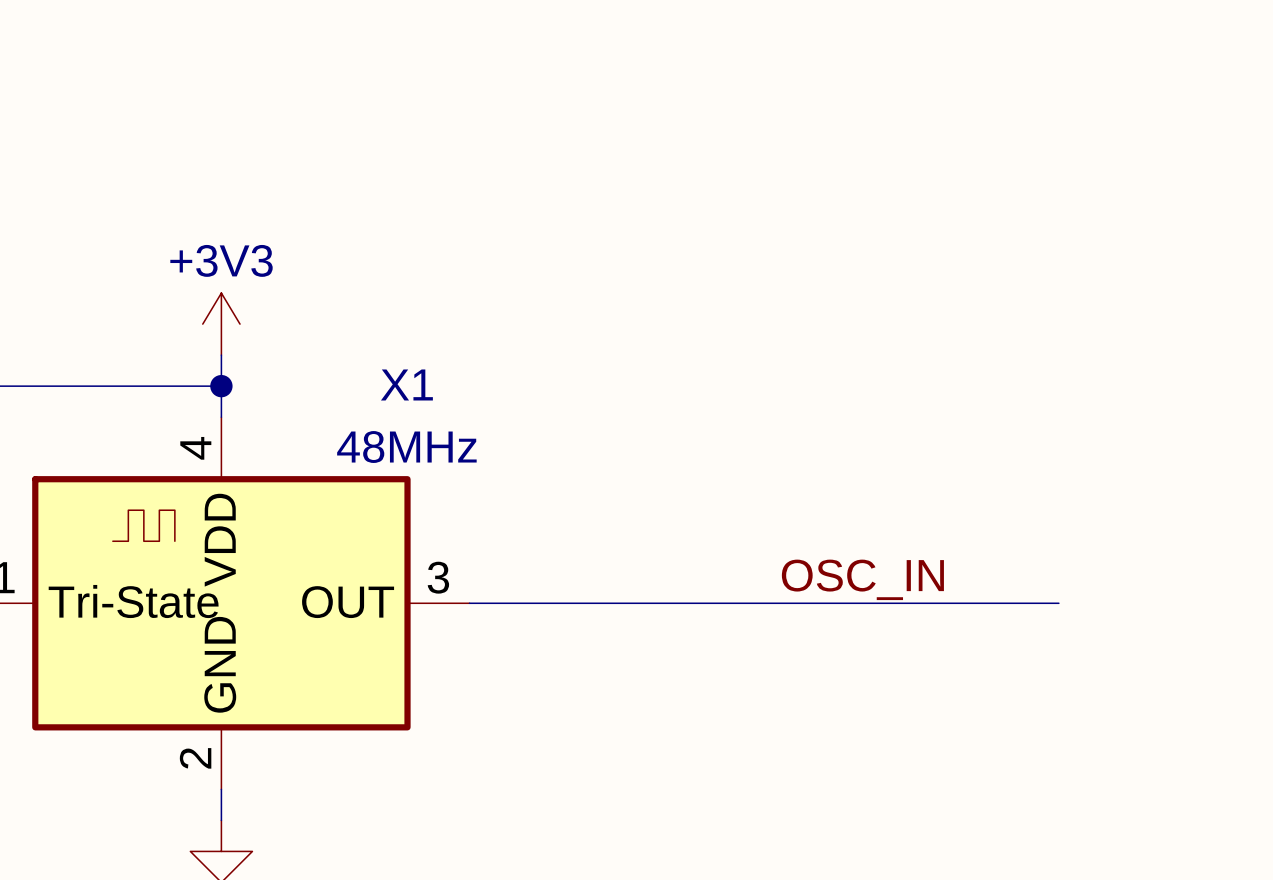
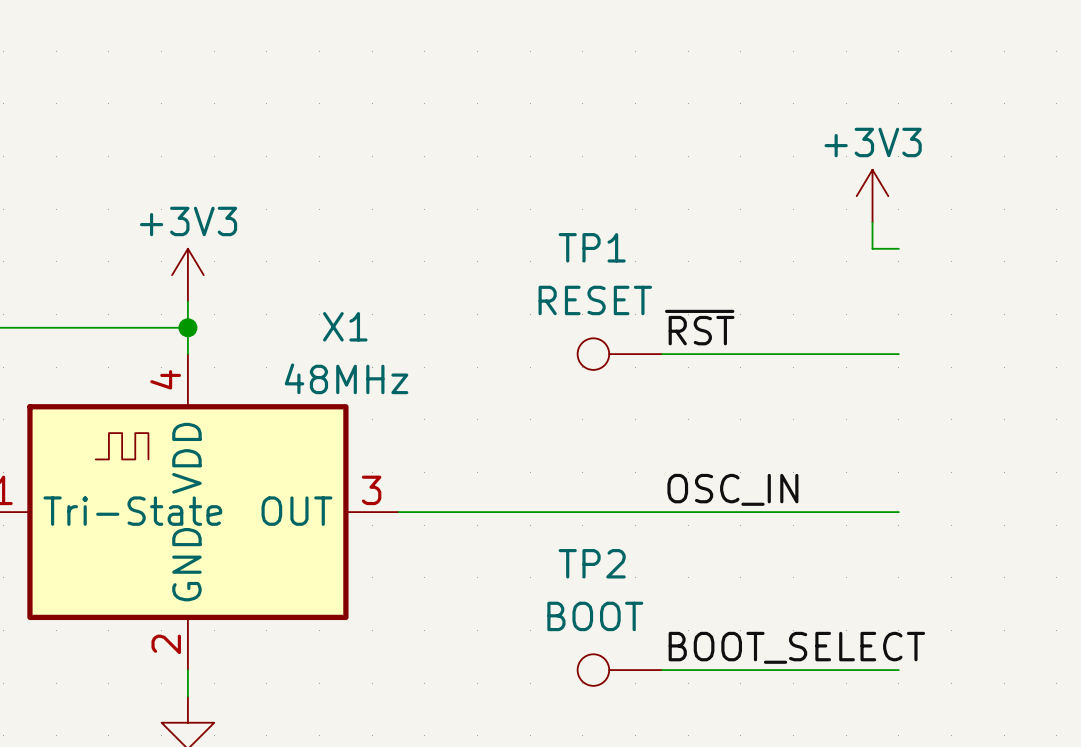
power symbol: none -> +3V3 (872, 196)
wire: none -> (872, 222) (872, 248) (898, 248)
label: none -> ~{RST} (699, 327)
TP1: none -> RESET (619, 354)
wire: none -> (661, 354) (898, 354)
label: none -> BOOT_SELECT (796, 647)
TP2: none -> BOOT (619, 670)
wire: none -> (661, 670) (898, 670)

